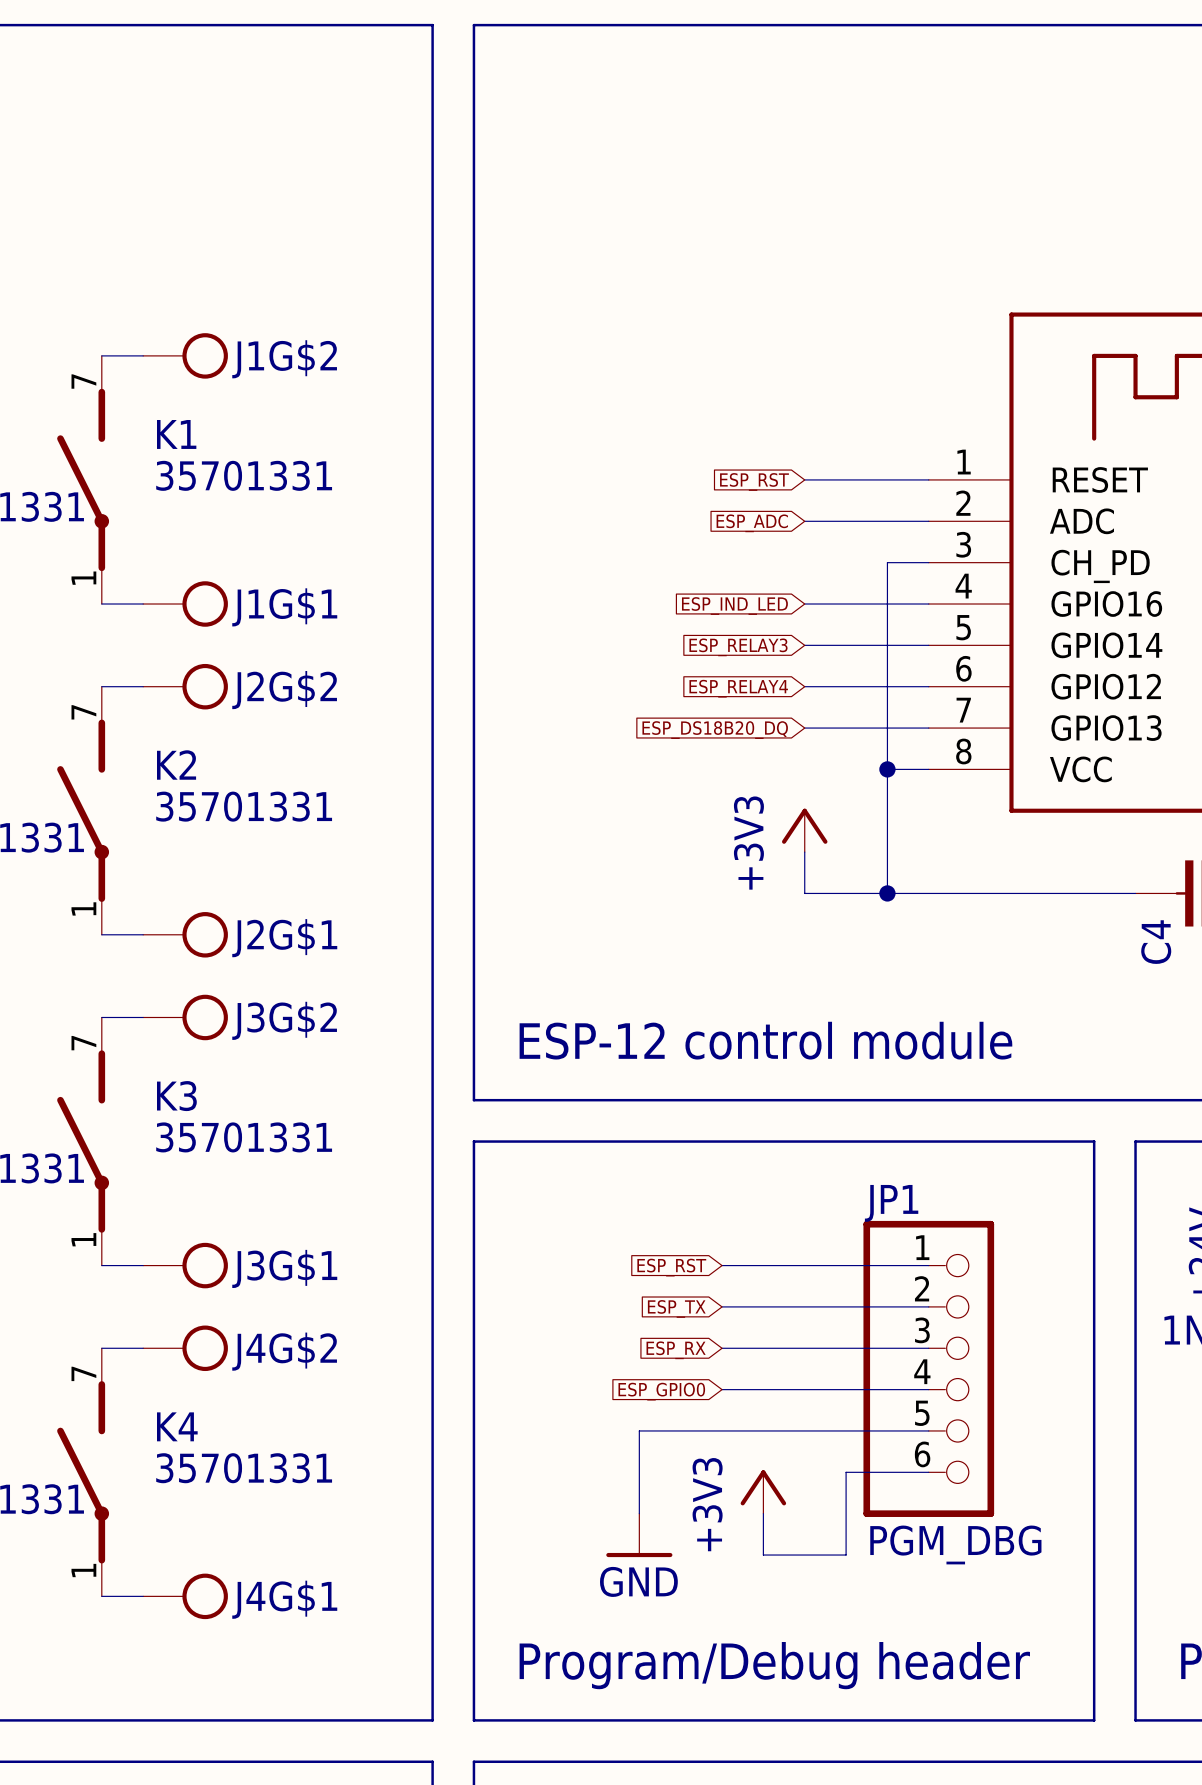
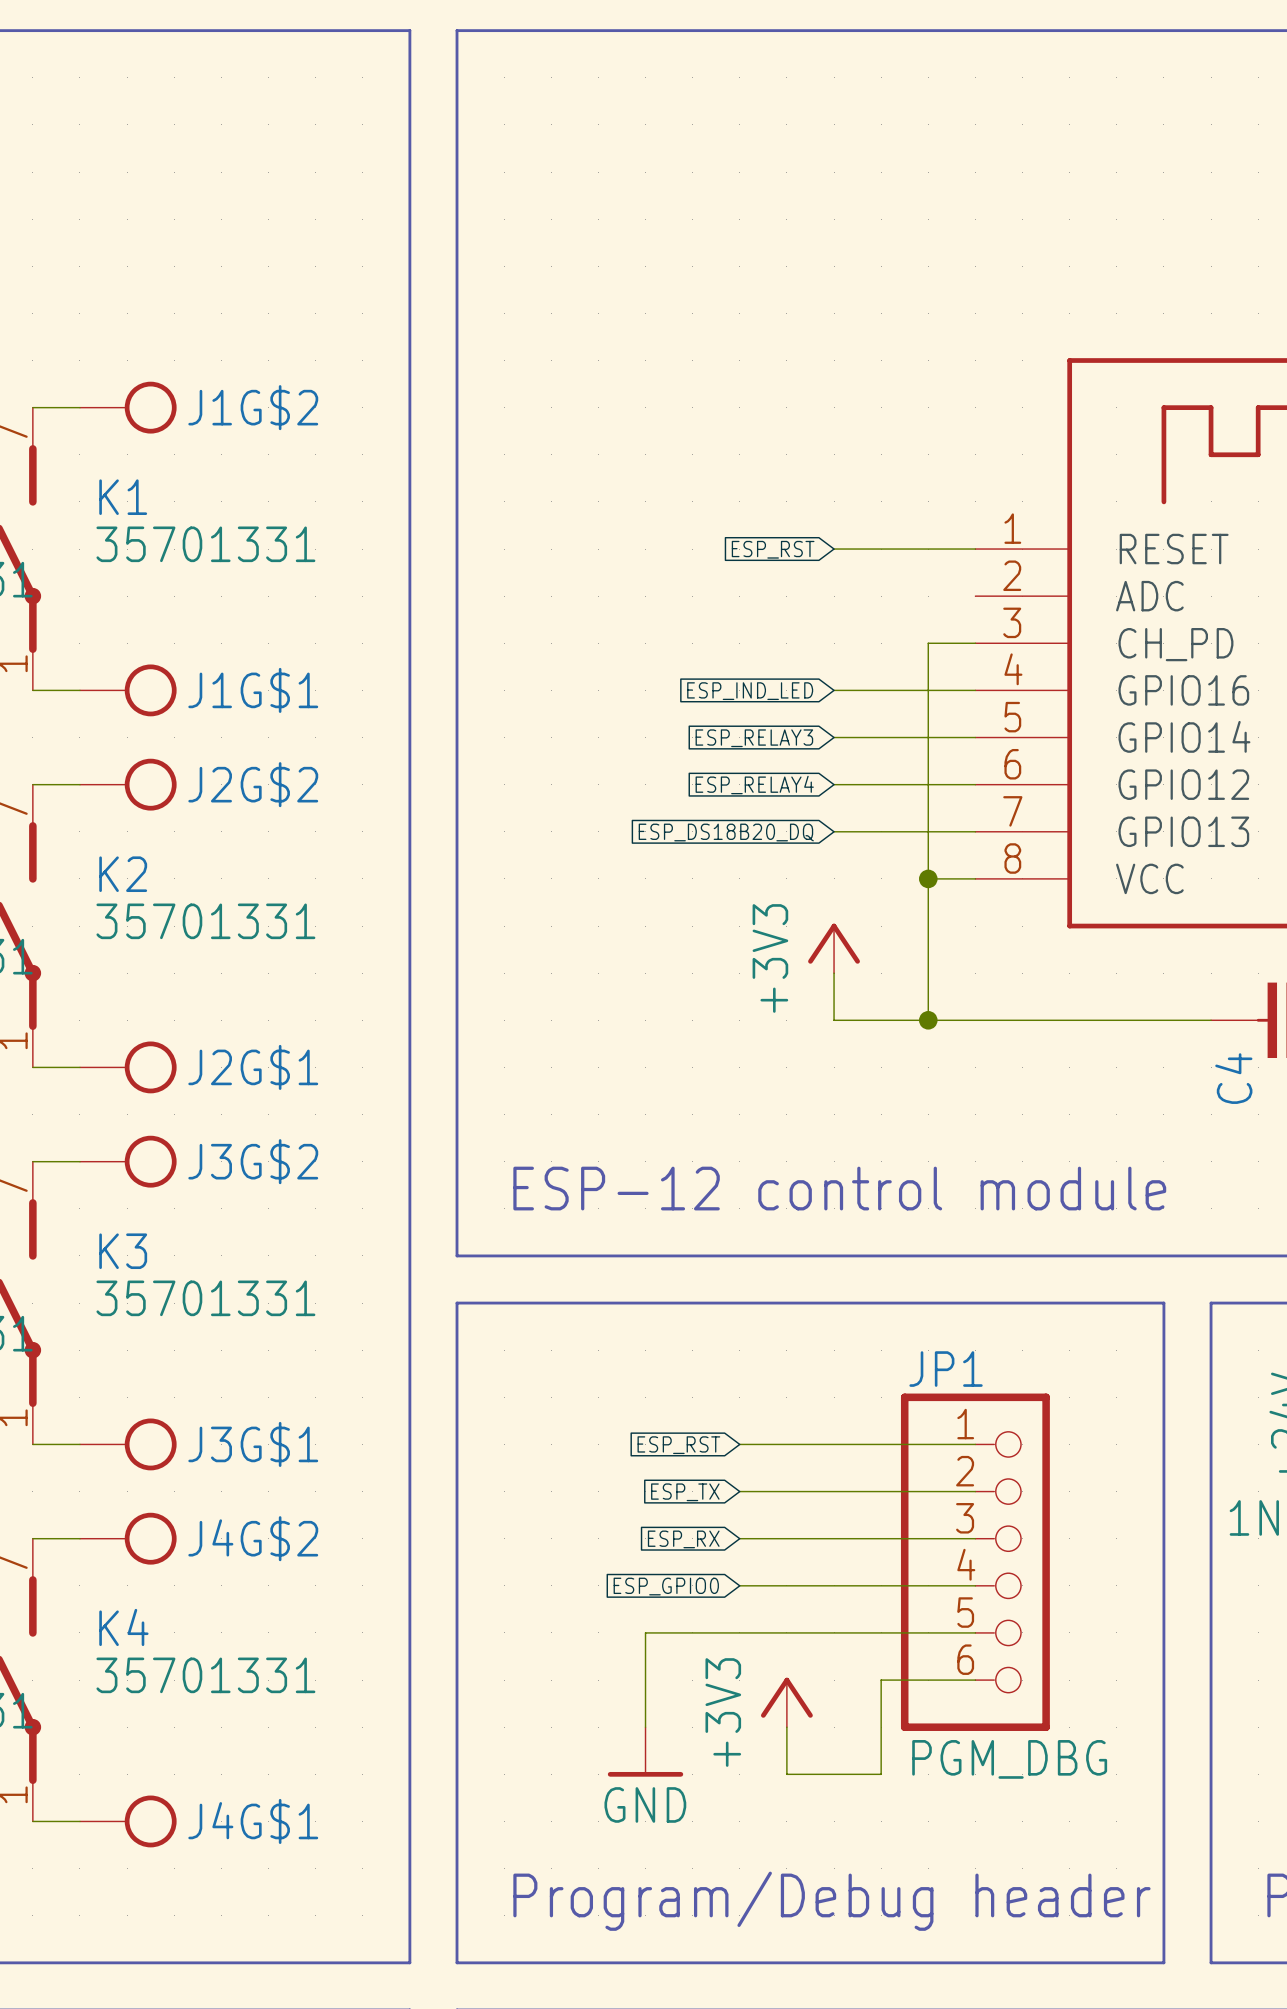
wire: (804, 521) (928, 521) -> none
global label: ESP_ADC (752, 523) -> none

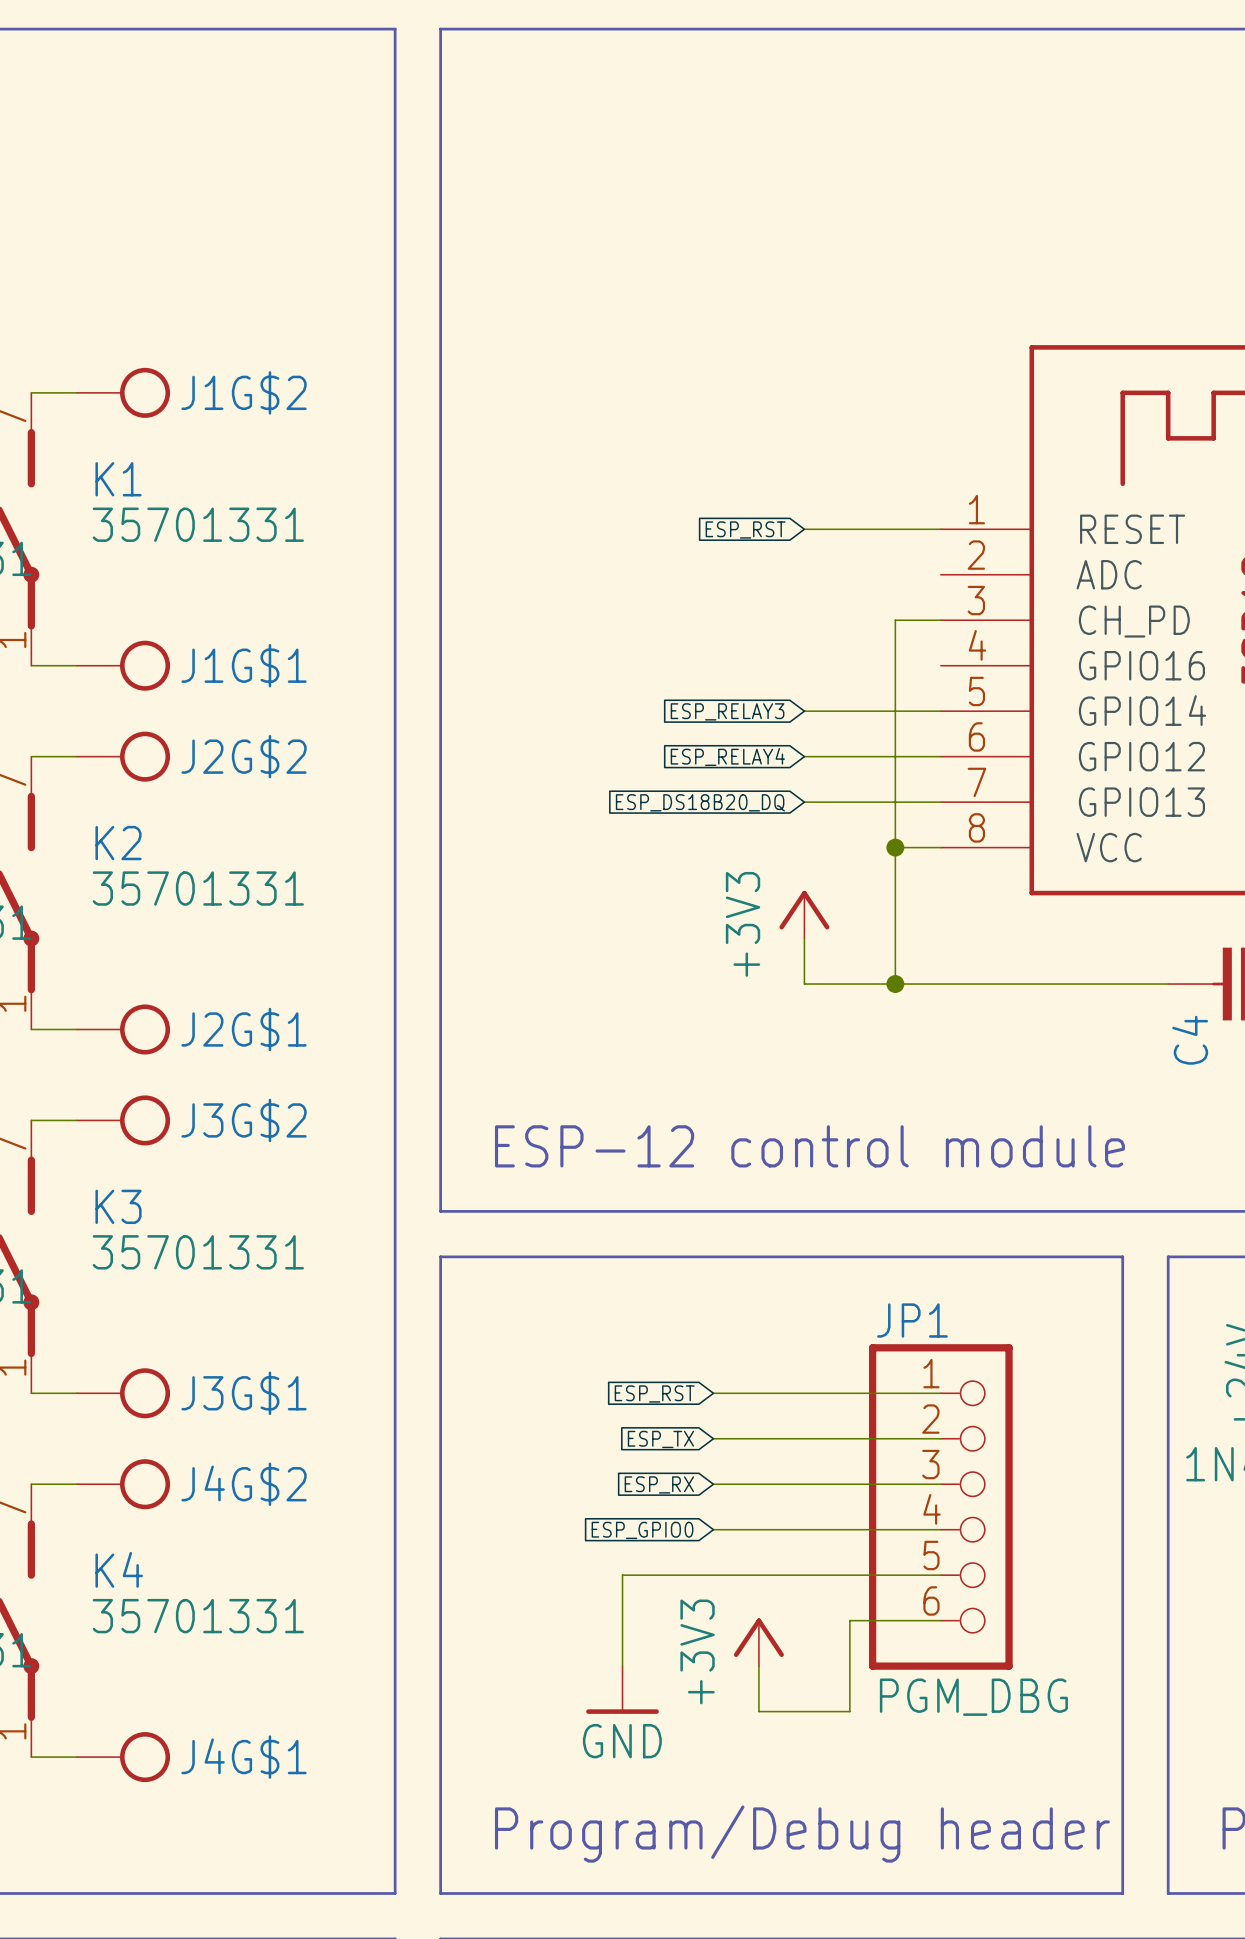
wire: (834, 690) (975, 690) -> none
global label: ESP_IND_LED (750, 691) -> none

